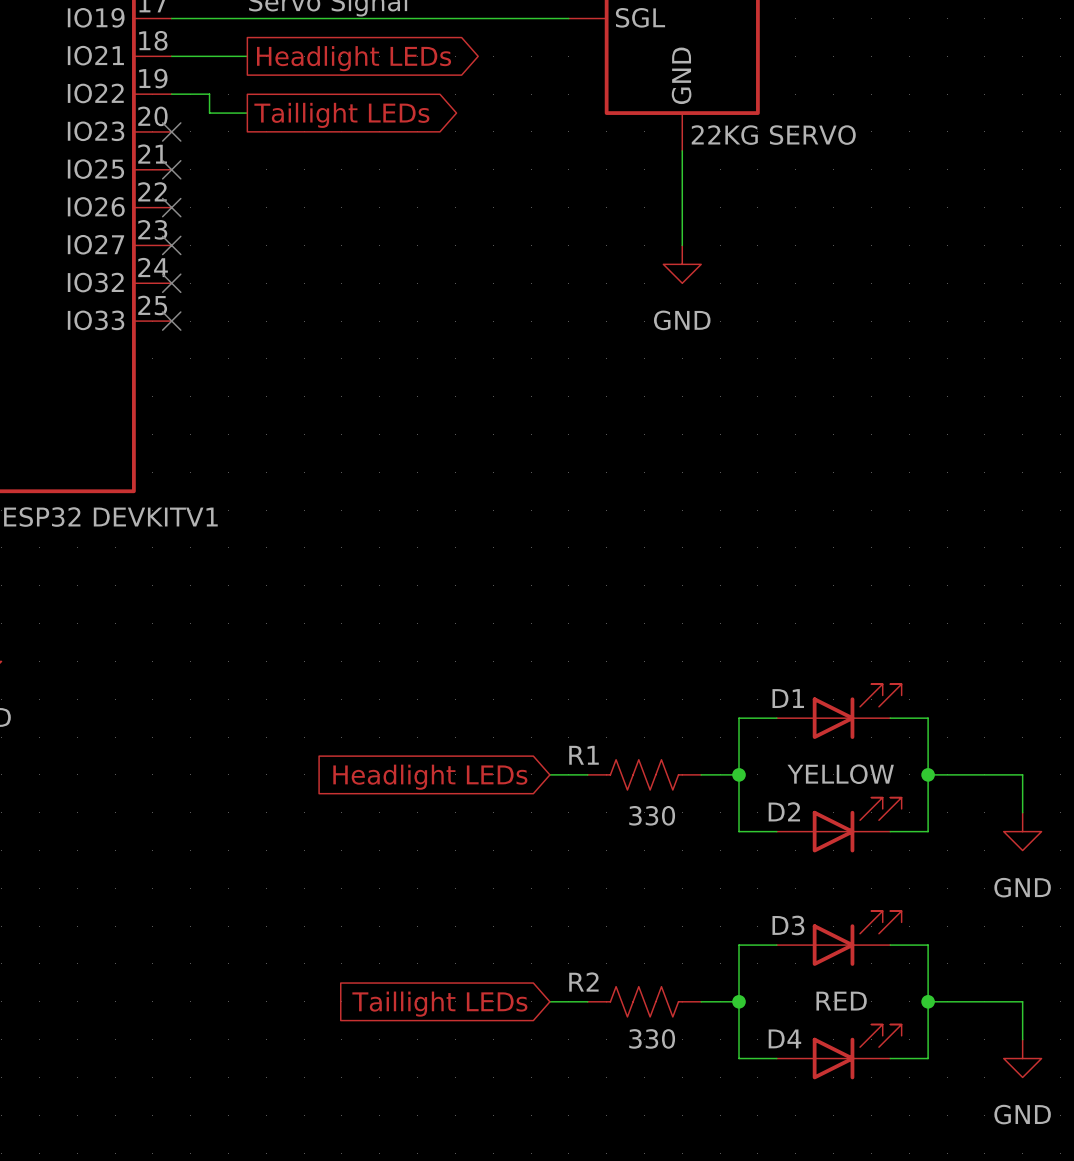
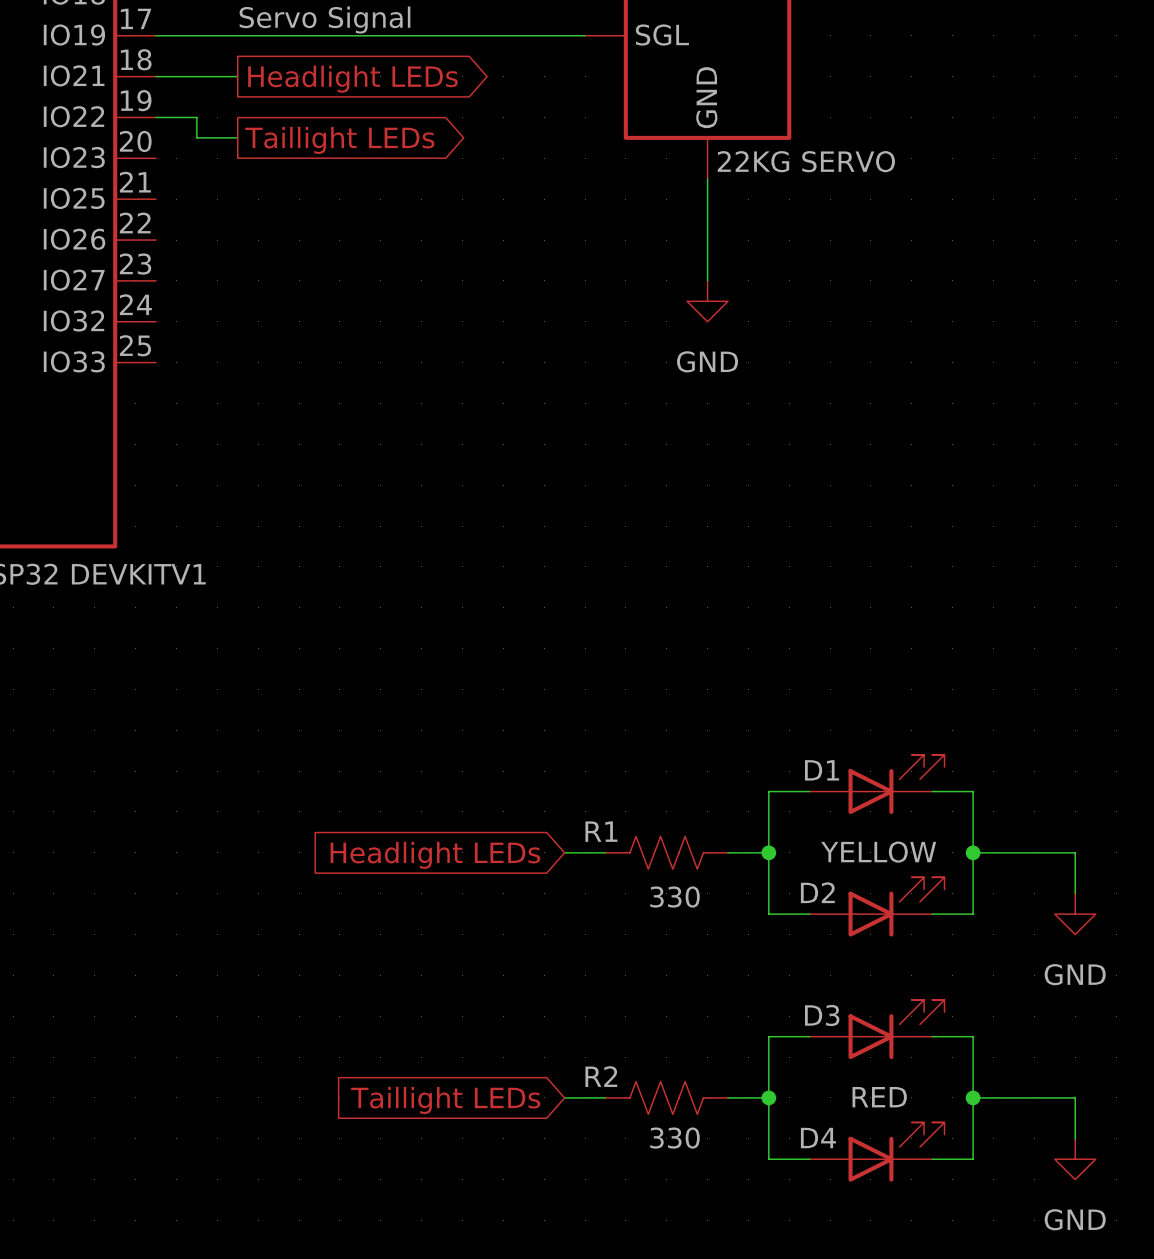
no-connect mark: (171, 131) -> none
no-connect mark: (171, 169) -> none
no-connect mark: (171, 207) -> none
no-connect mark: (171, 245) -> none
no-connect mark: (171, 283) -> none
no-connect mark: (171, 321) -> none

